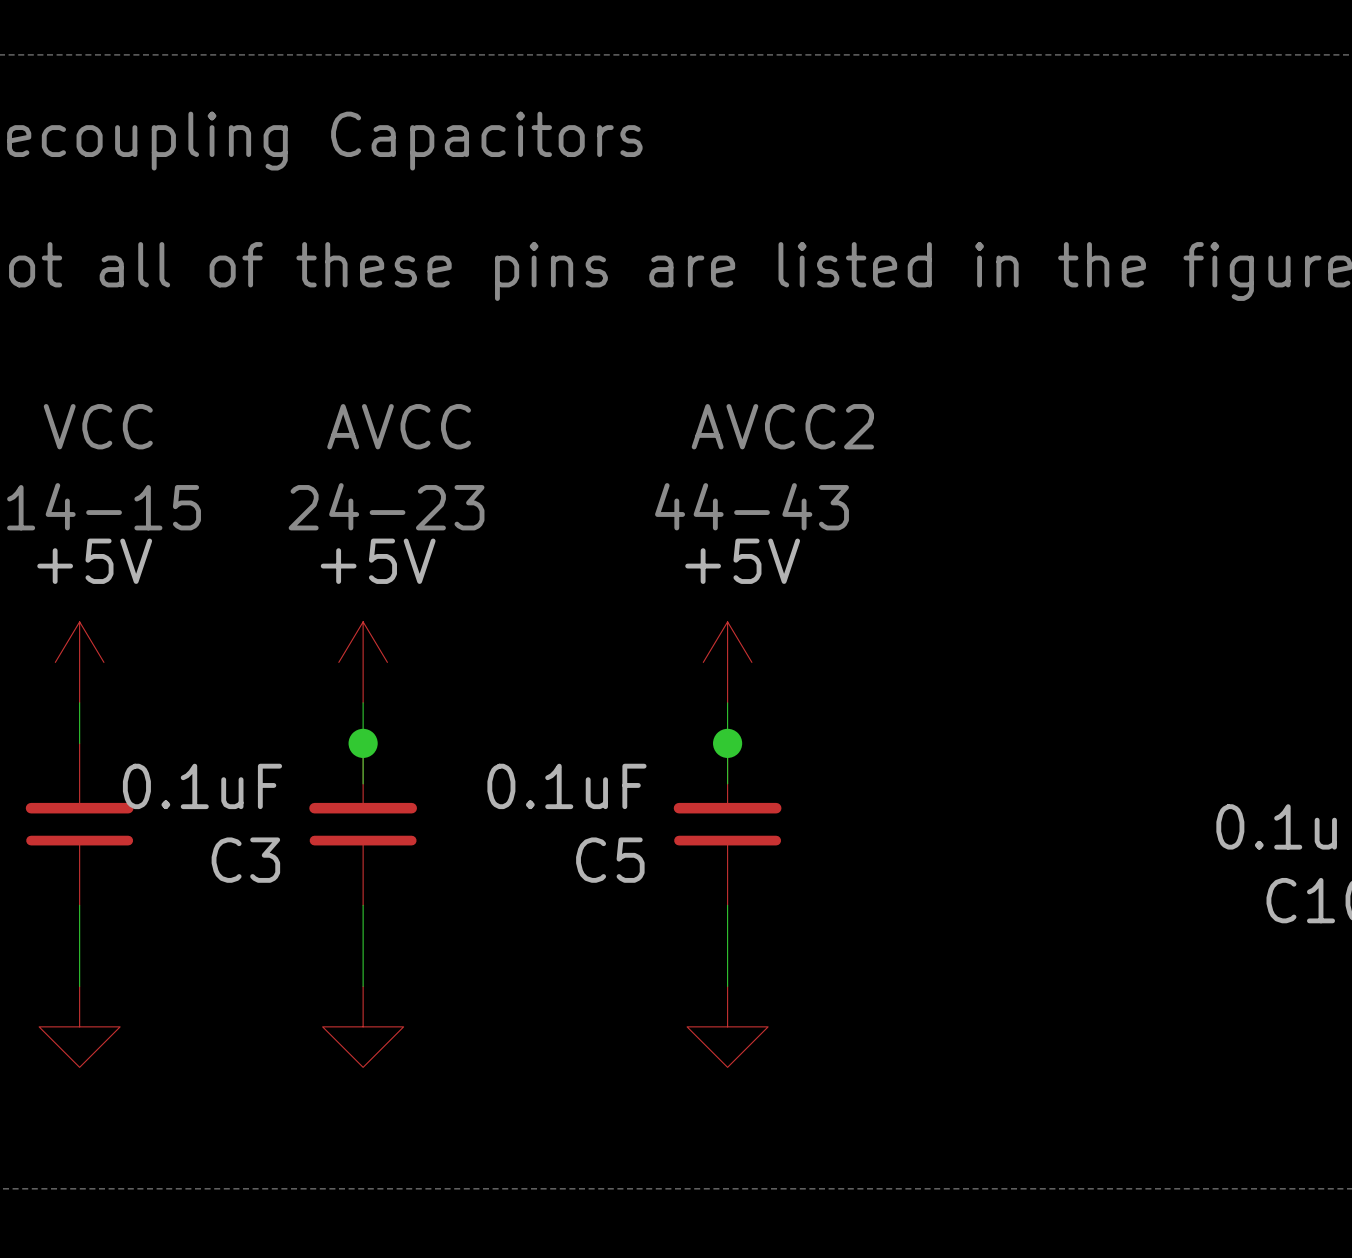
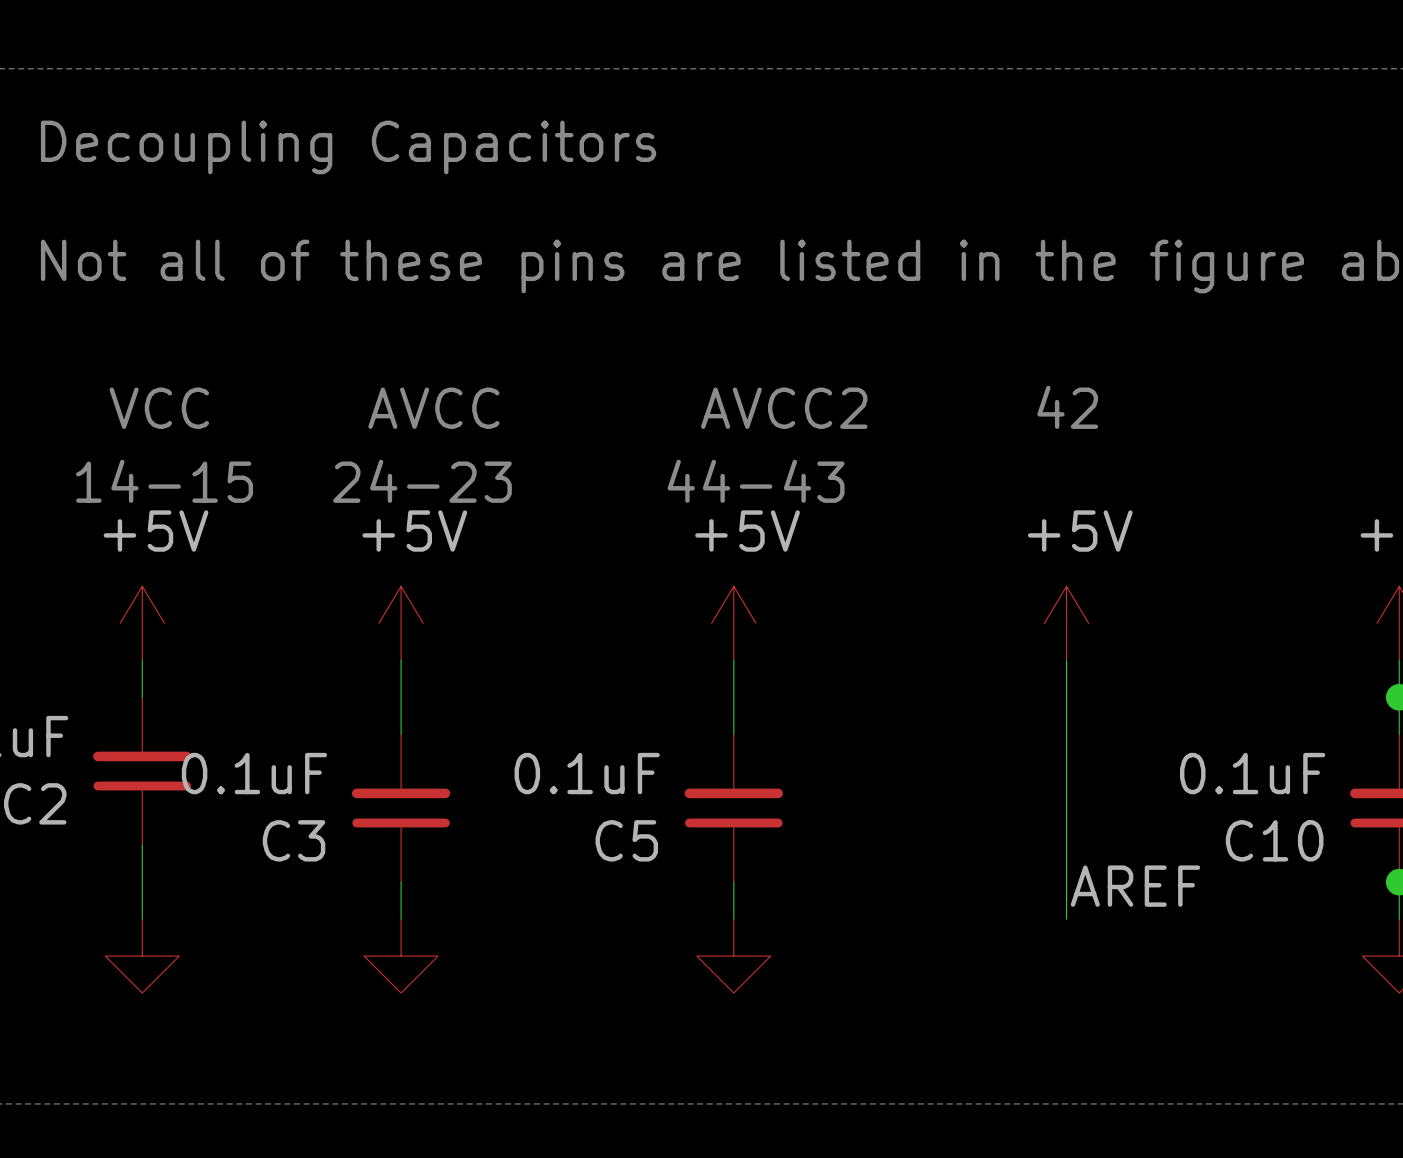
text: none -> 42 (1067, 407)
power symbol: none -> +5V (1066, 623)
wire: none -> (1066, 660) (1066, 919)
junction: (363, 743) -> none
junction: (727, 743) -> none
C3 position: (363, 824) -> (401, 808)
C5 position: (727, 824) -> (733, 808)
label: none -> AREF (1135, 886)

